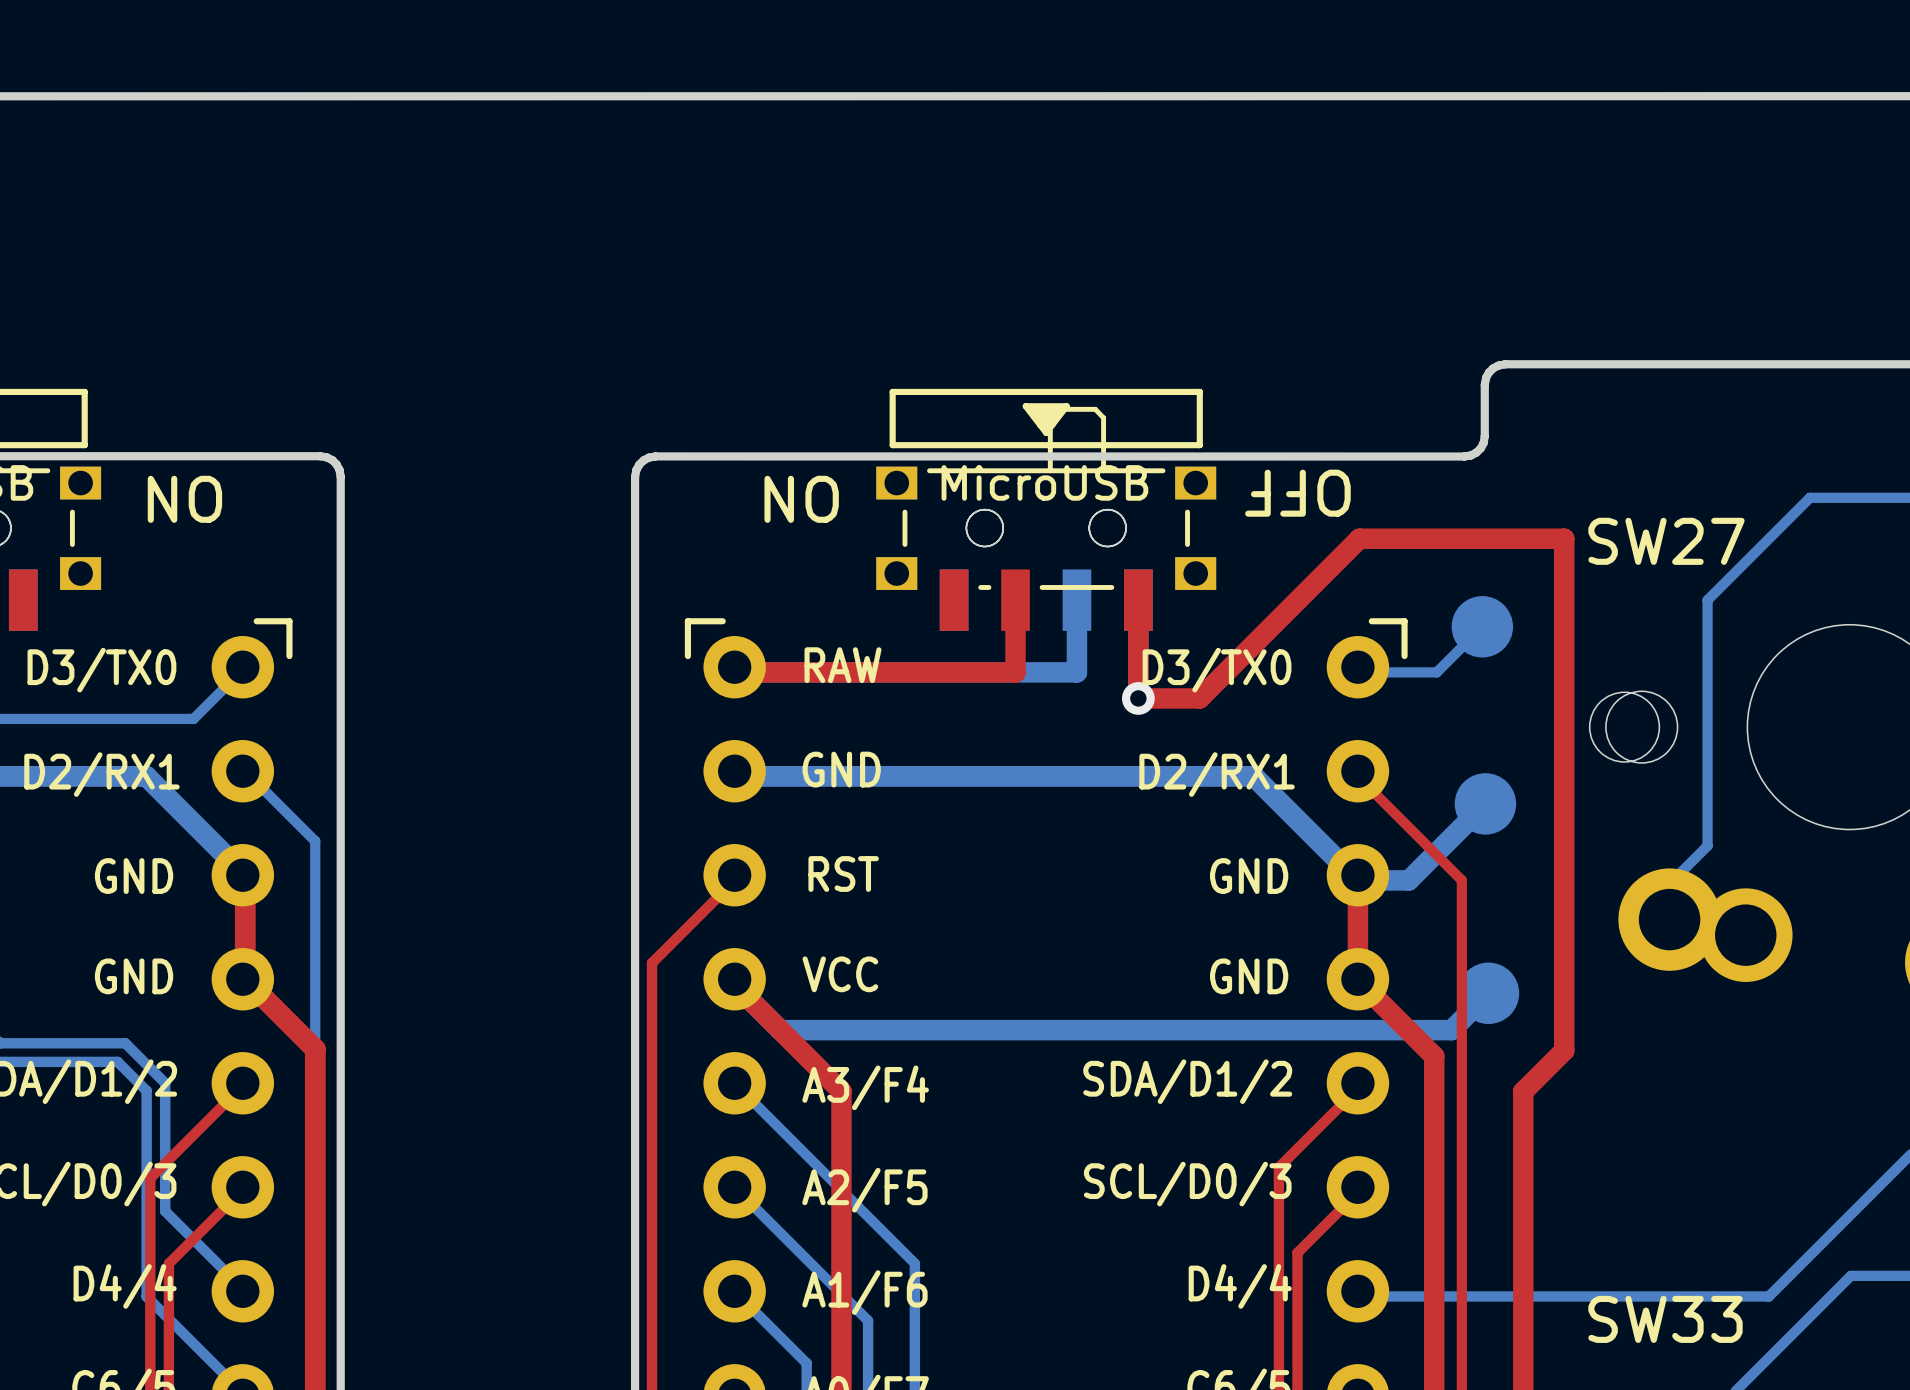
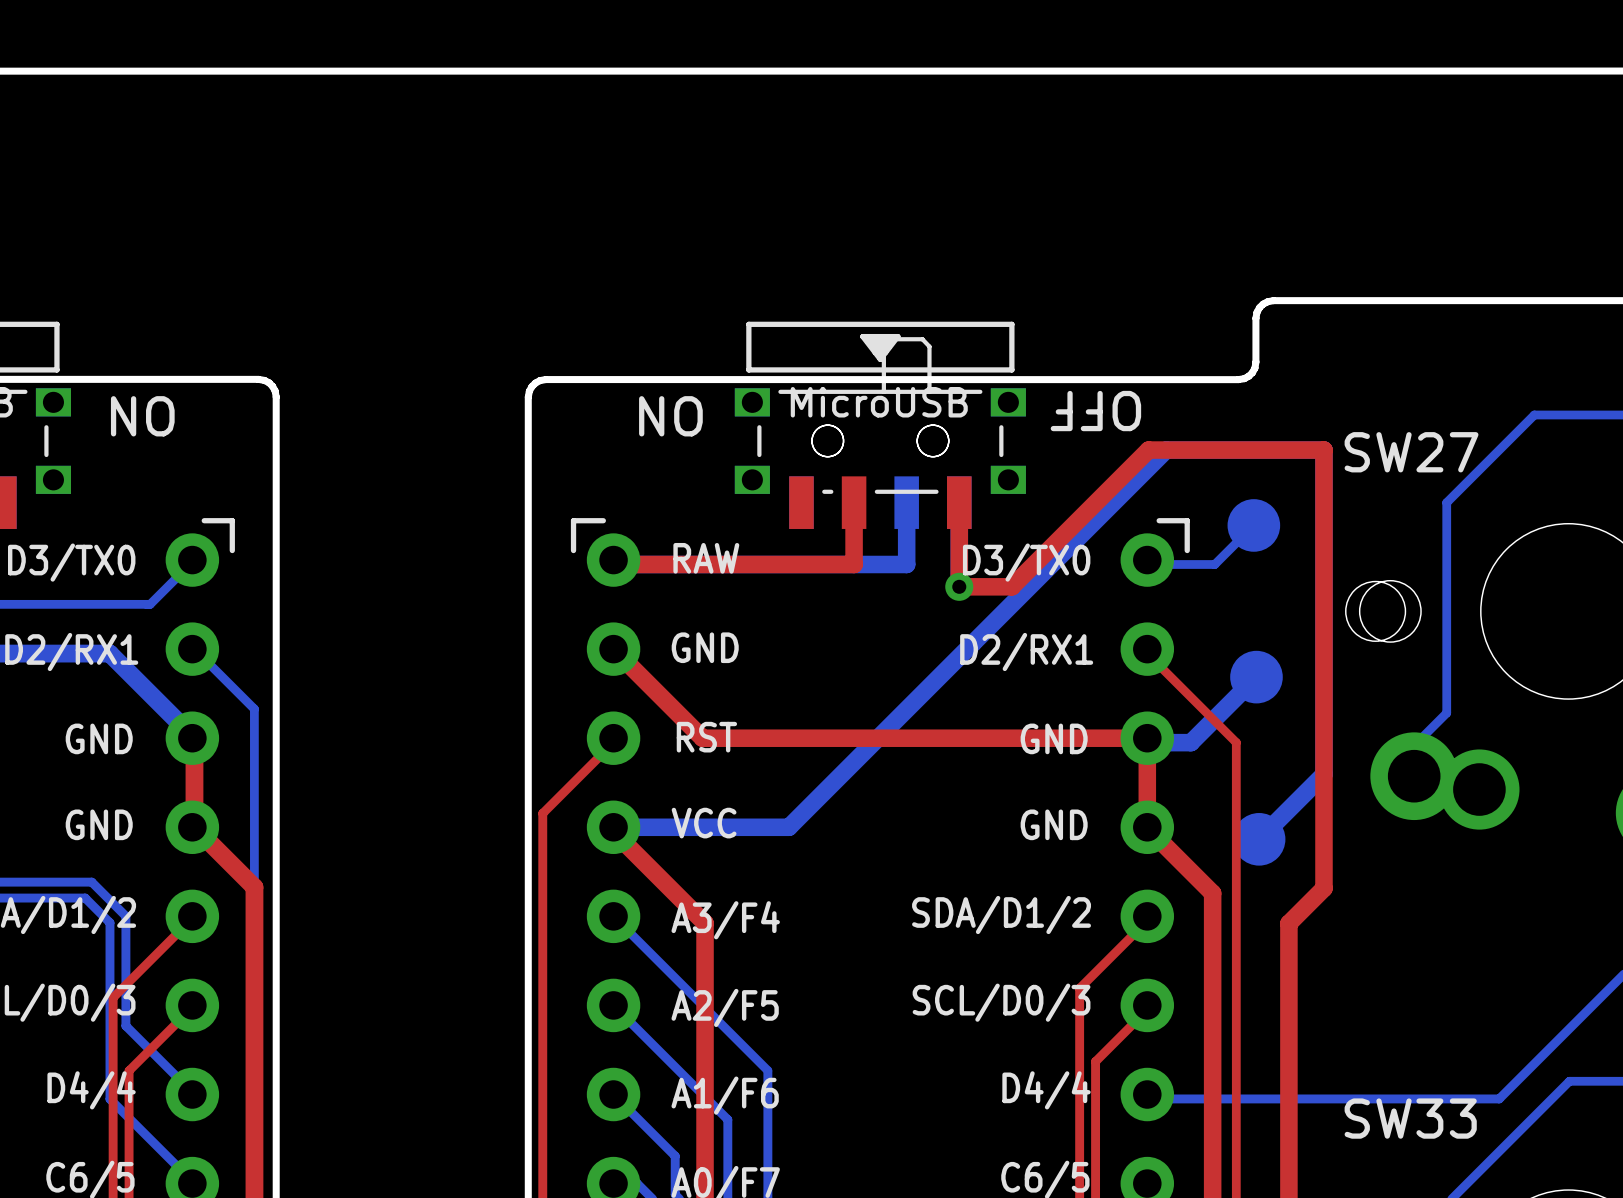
top track: none -> (613, 649) (702, 738) (1147, 738)
bottom track: (734, 776) (1253, 776) (1357, 880) -> none
bottom track: (734, 984) (780, 1030) (1451, 1030) (1488, 993) -> (613, 827) (788, 827) (1166, 450) (1323, 450) (1323, 774) (1259, 839)

